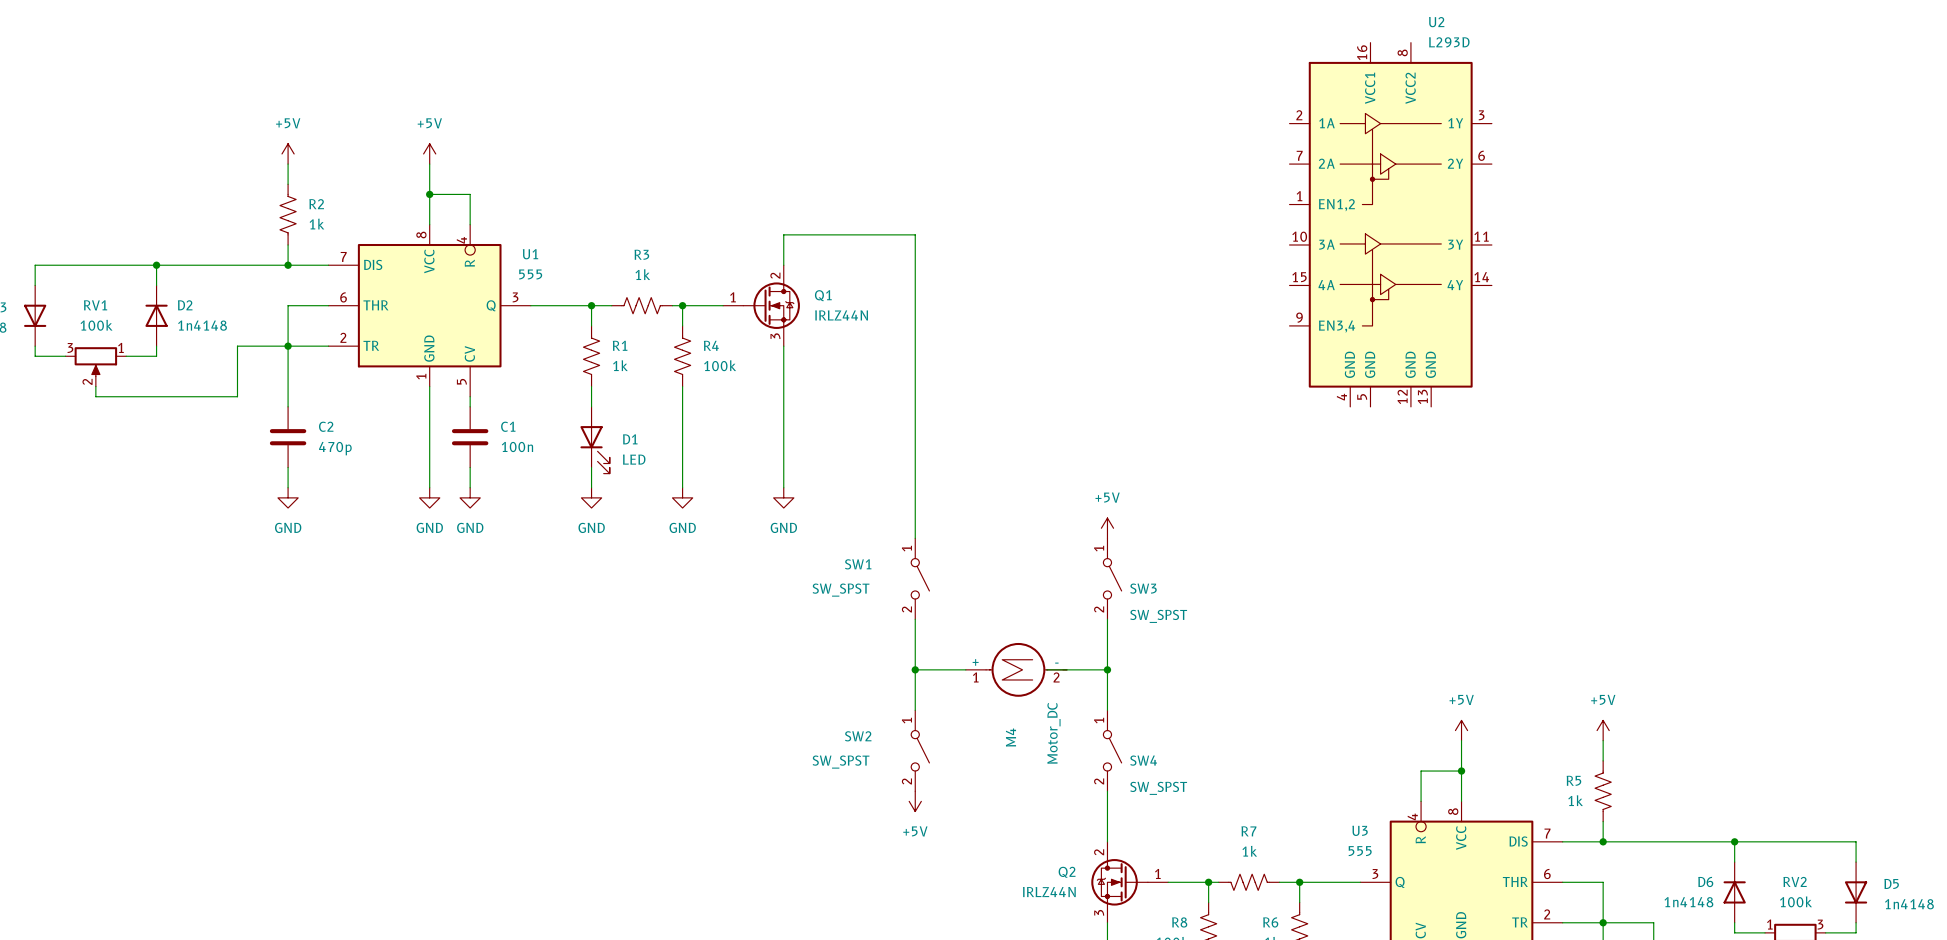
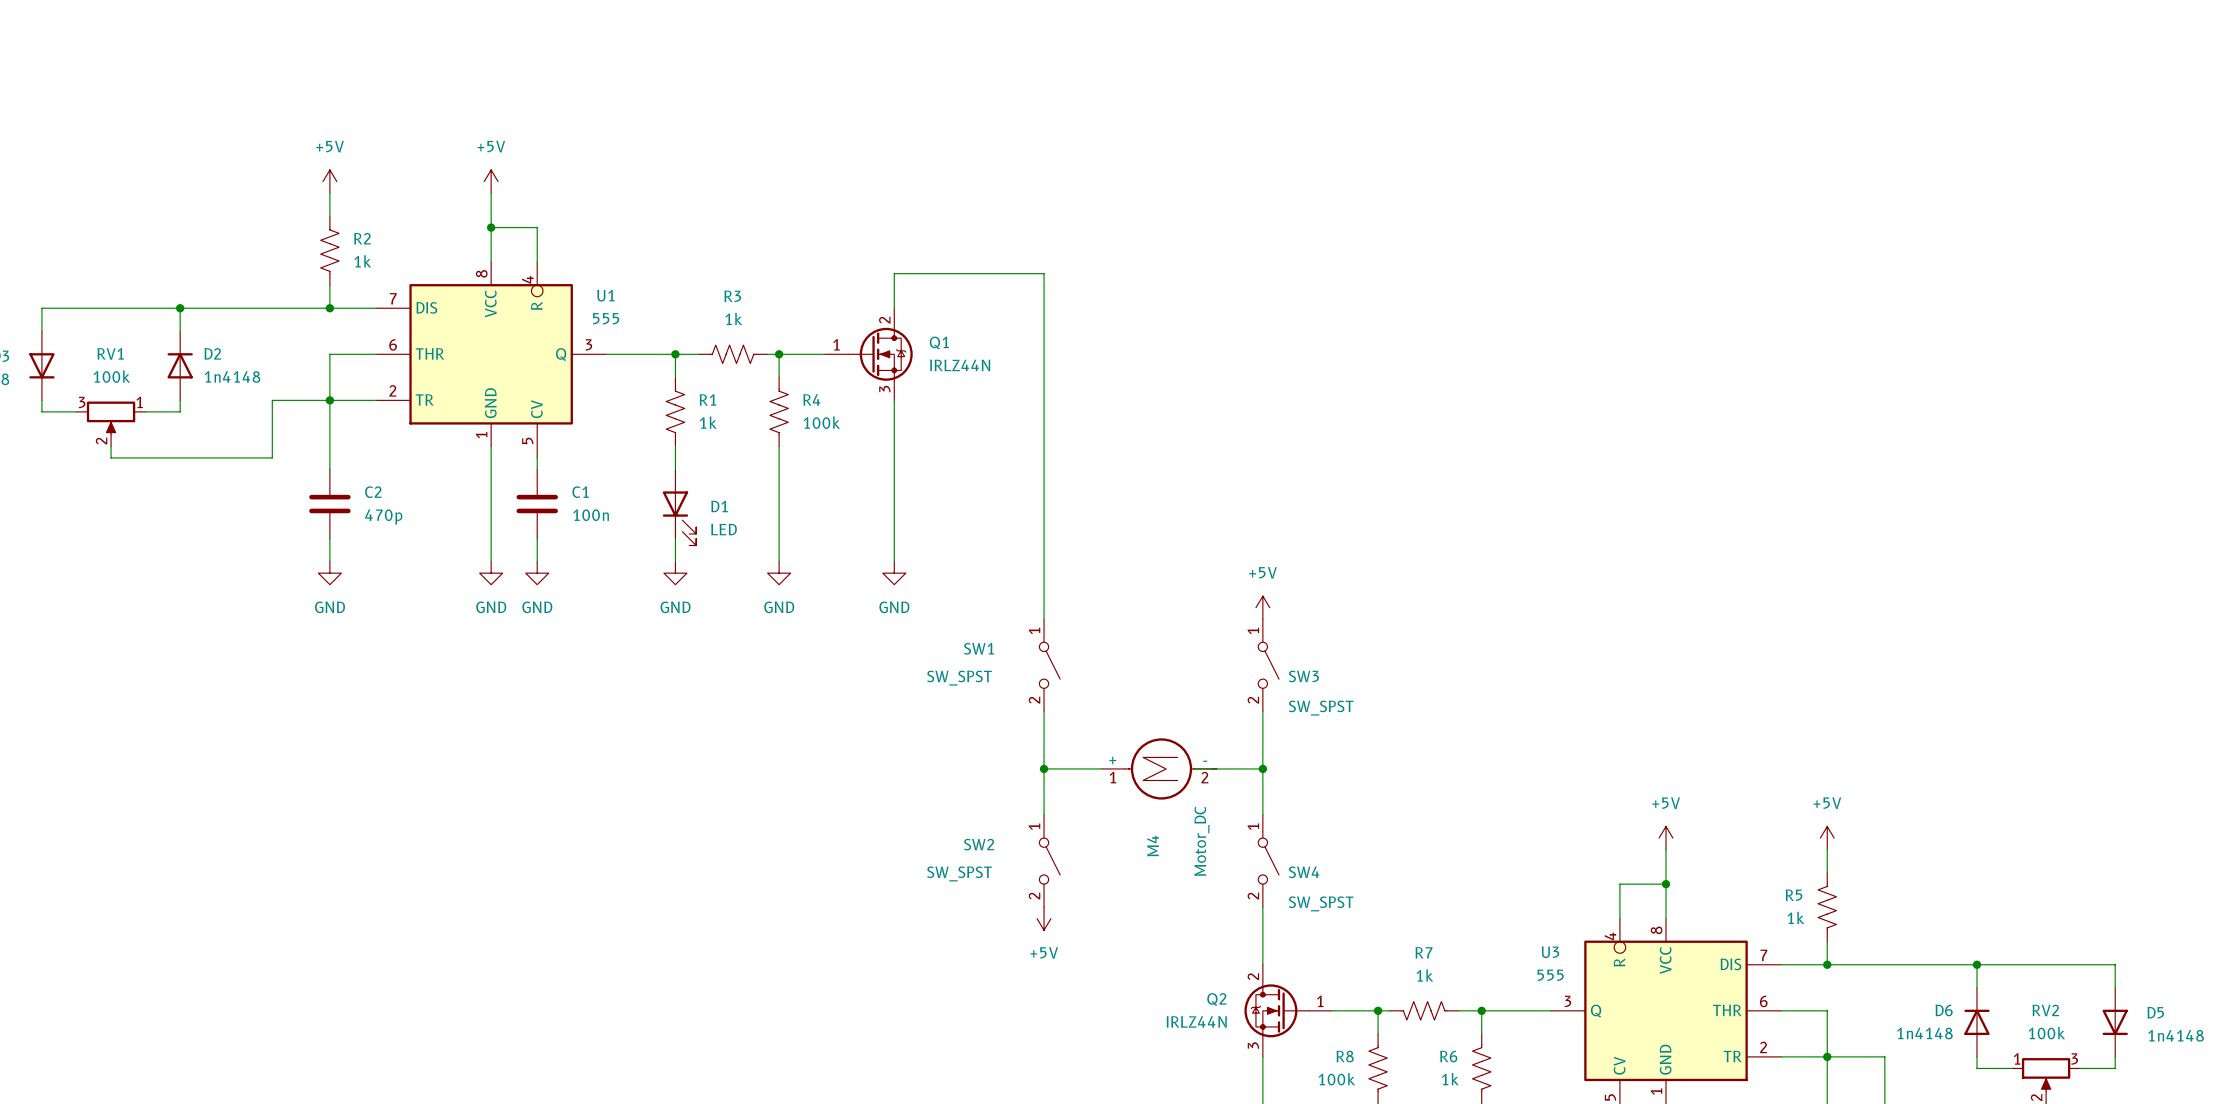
U2: L293D (1390, 224) -> none

